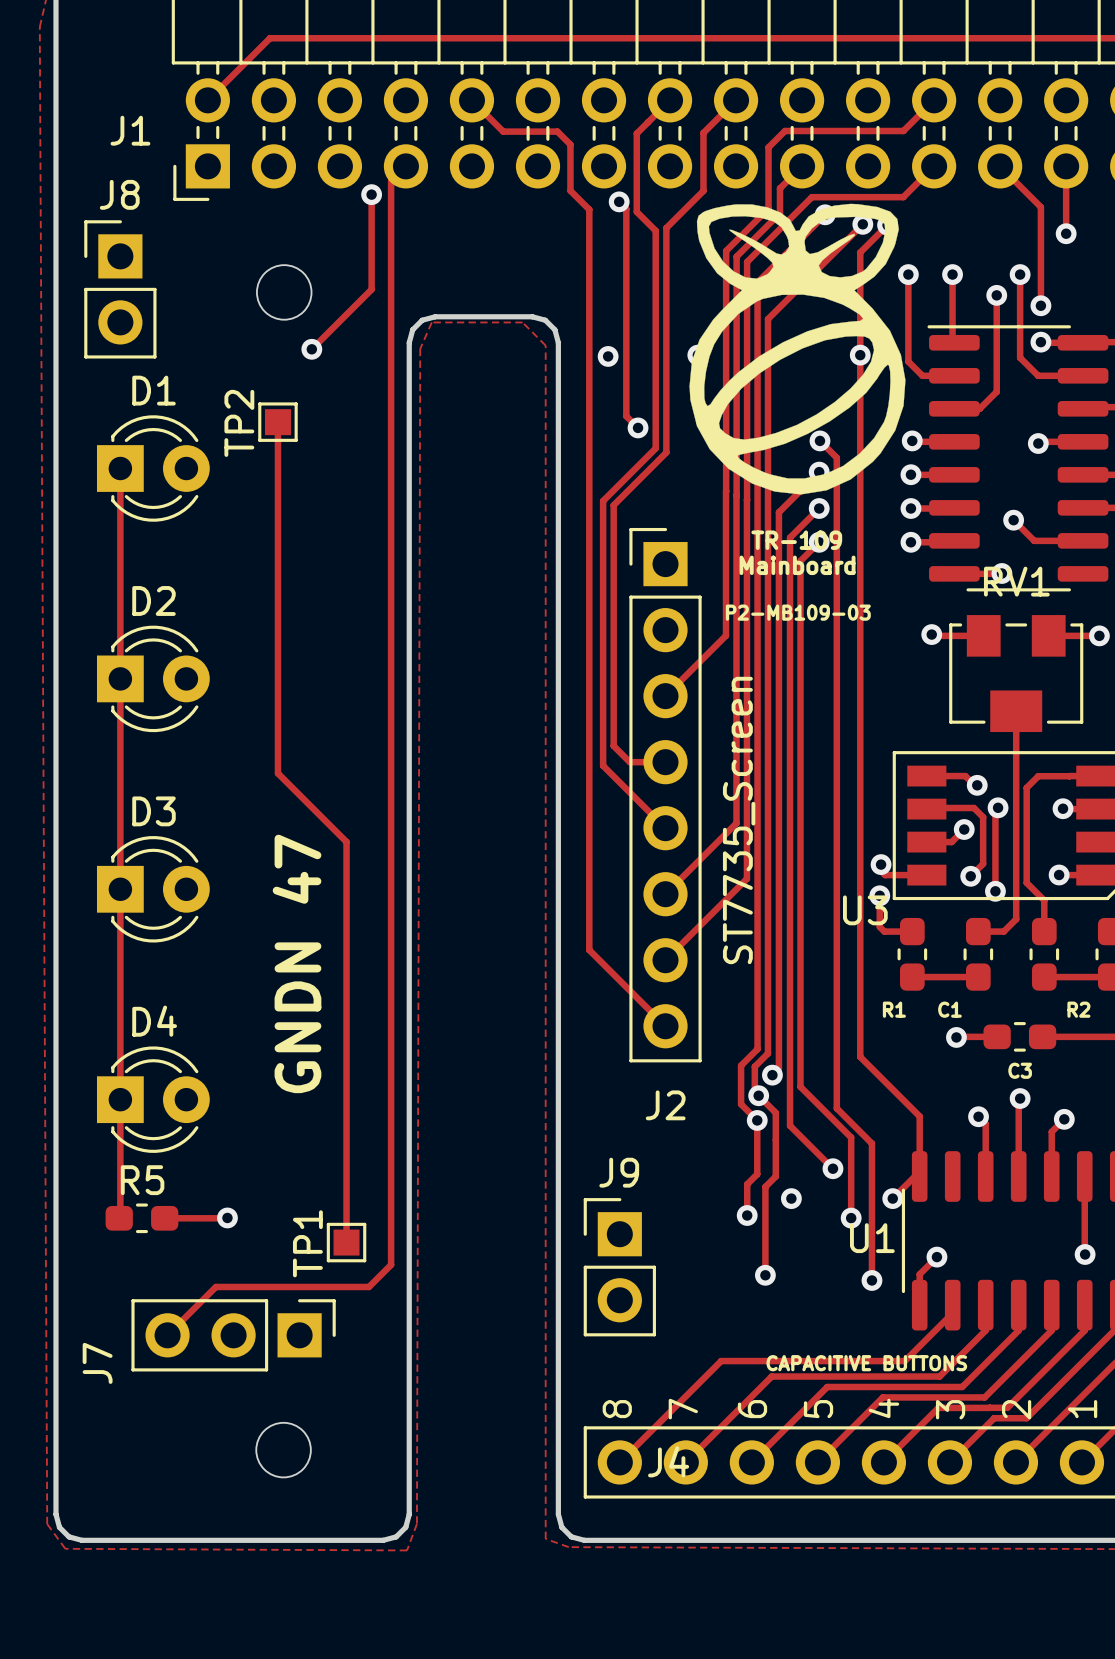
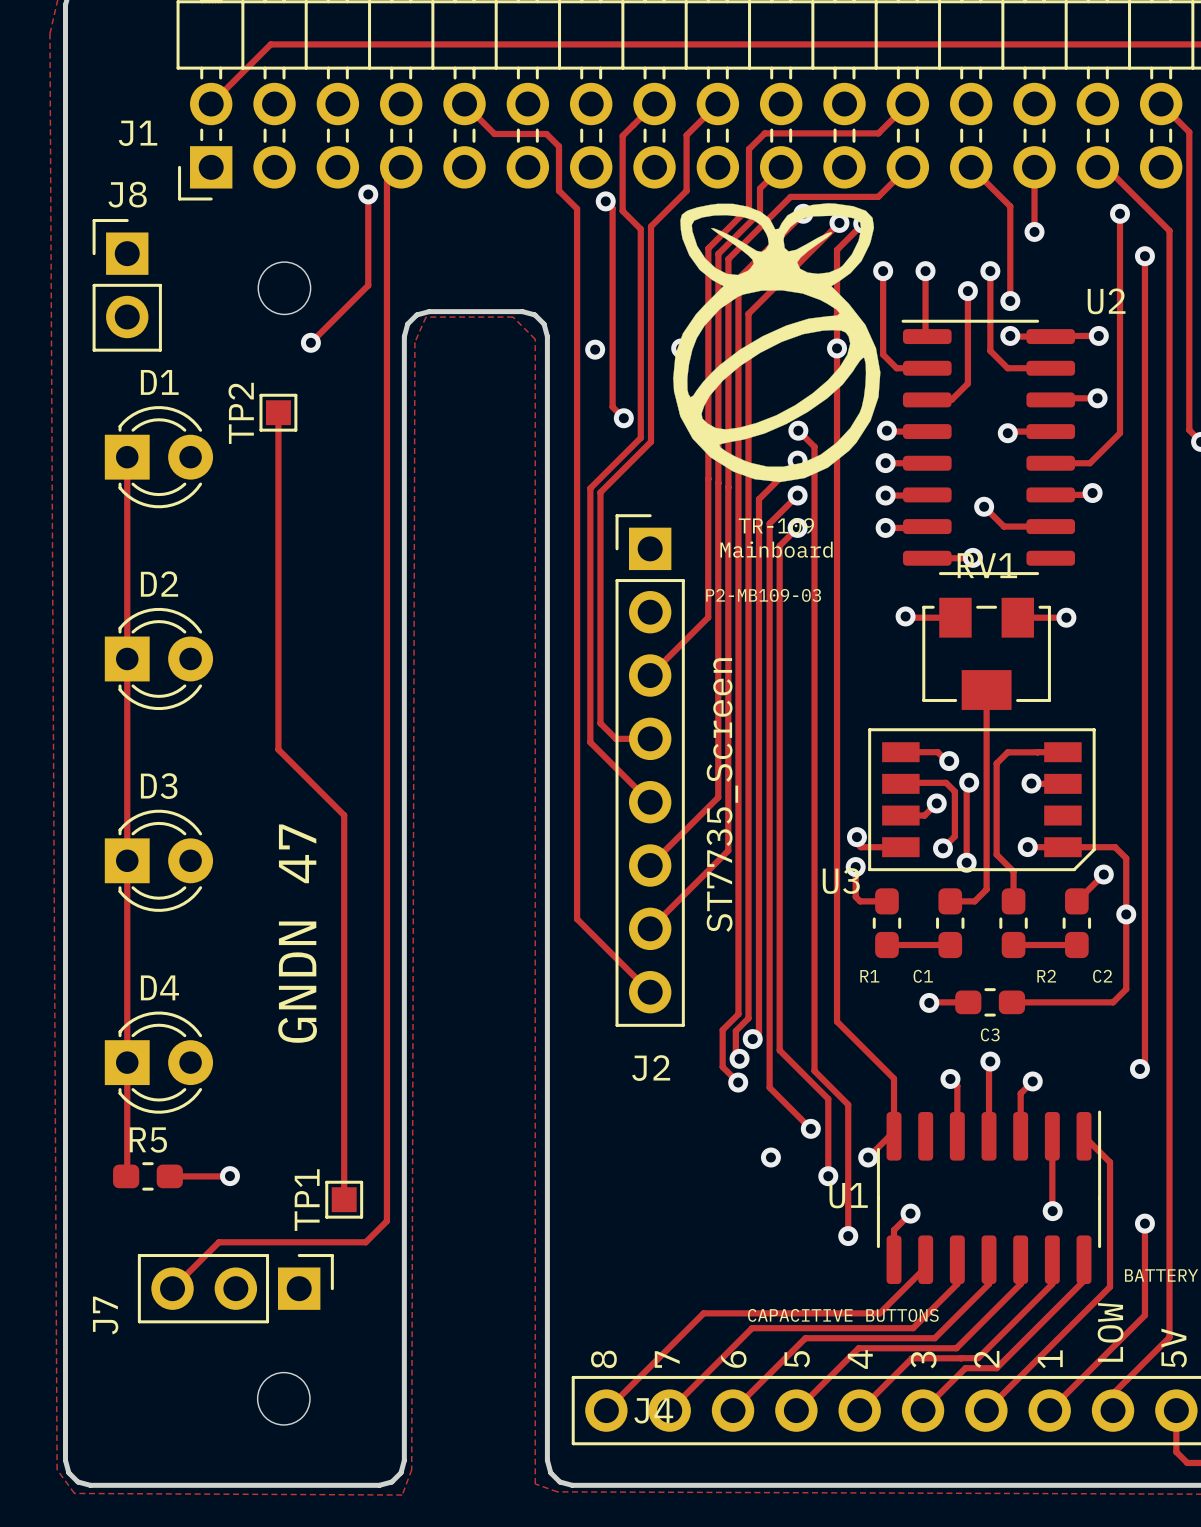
track: (758, 1095) (775, 1112) (775, 1176) (765, 1186) (765, 1275) -> none
track: (757, 1120) (757, 1174) (747, 1184) (747, 1215) -> none
via: (747, 1215) -> none
J9: (619, 1267) -> none
via: (765, 1275) -> none

